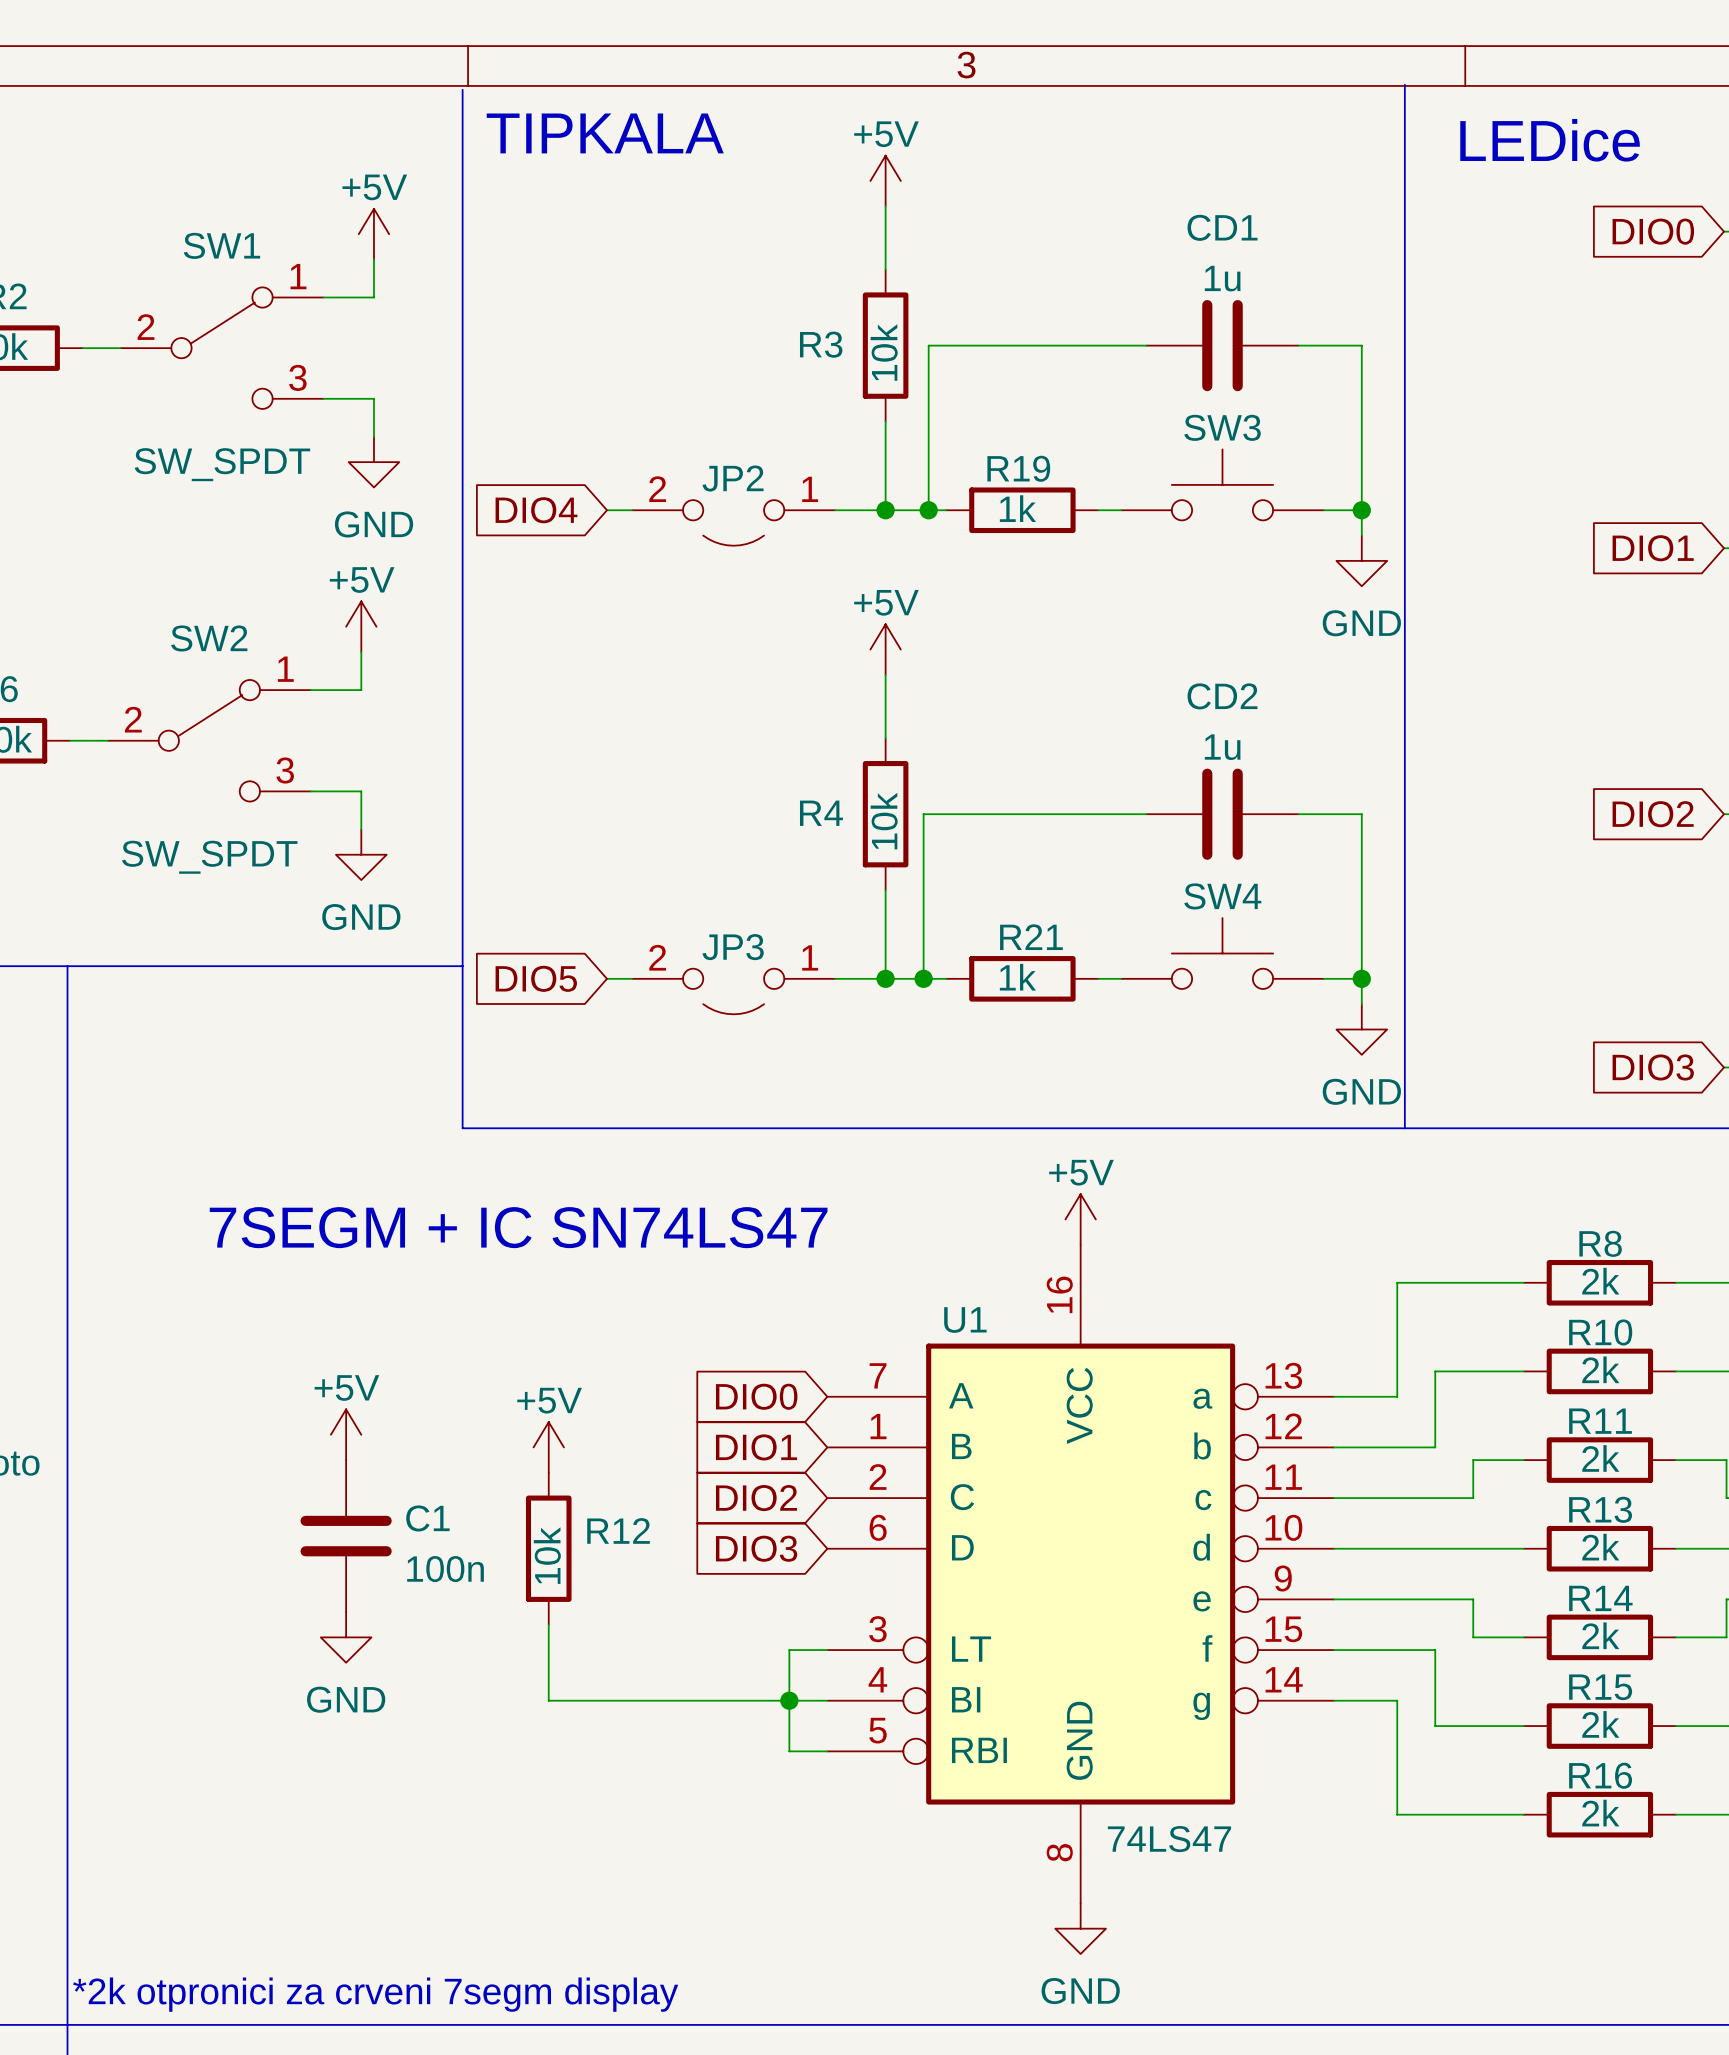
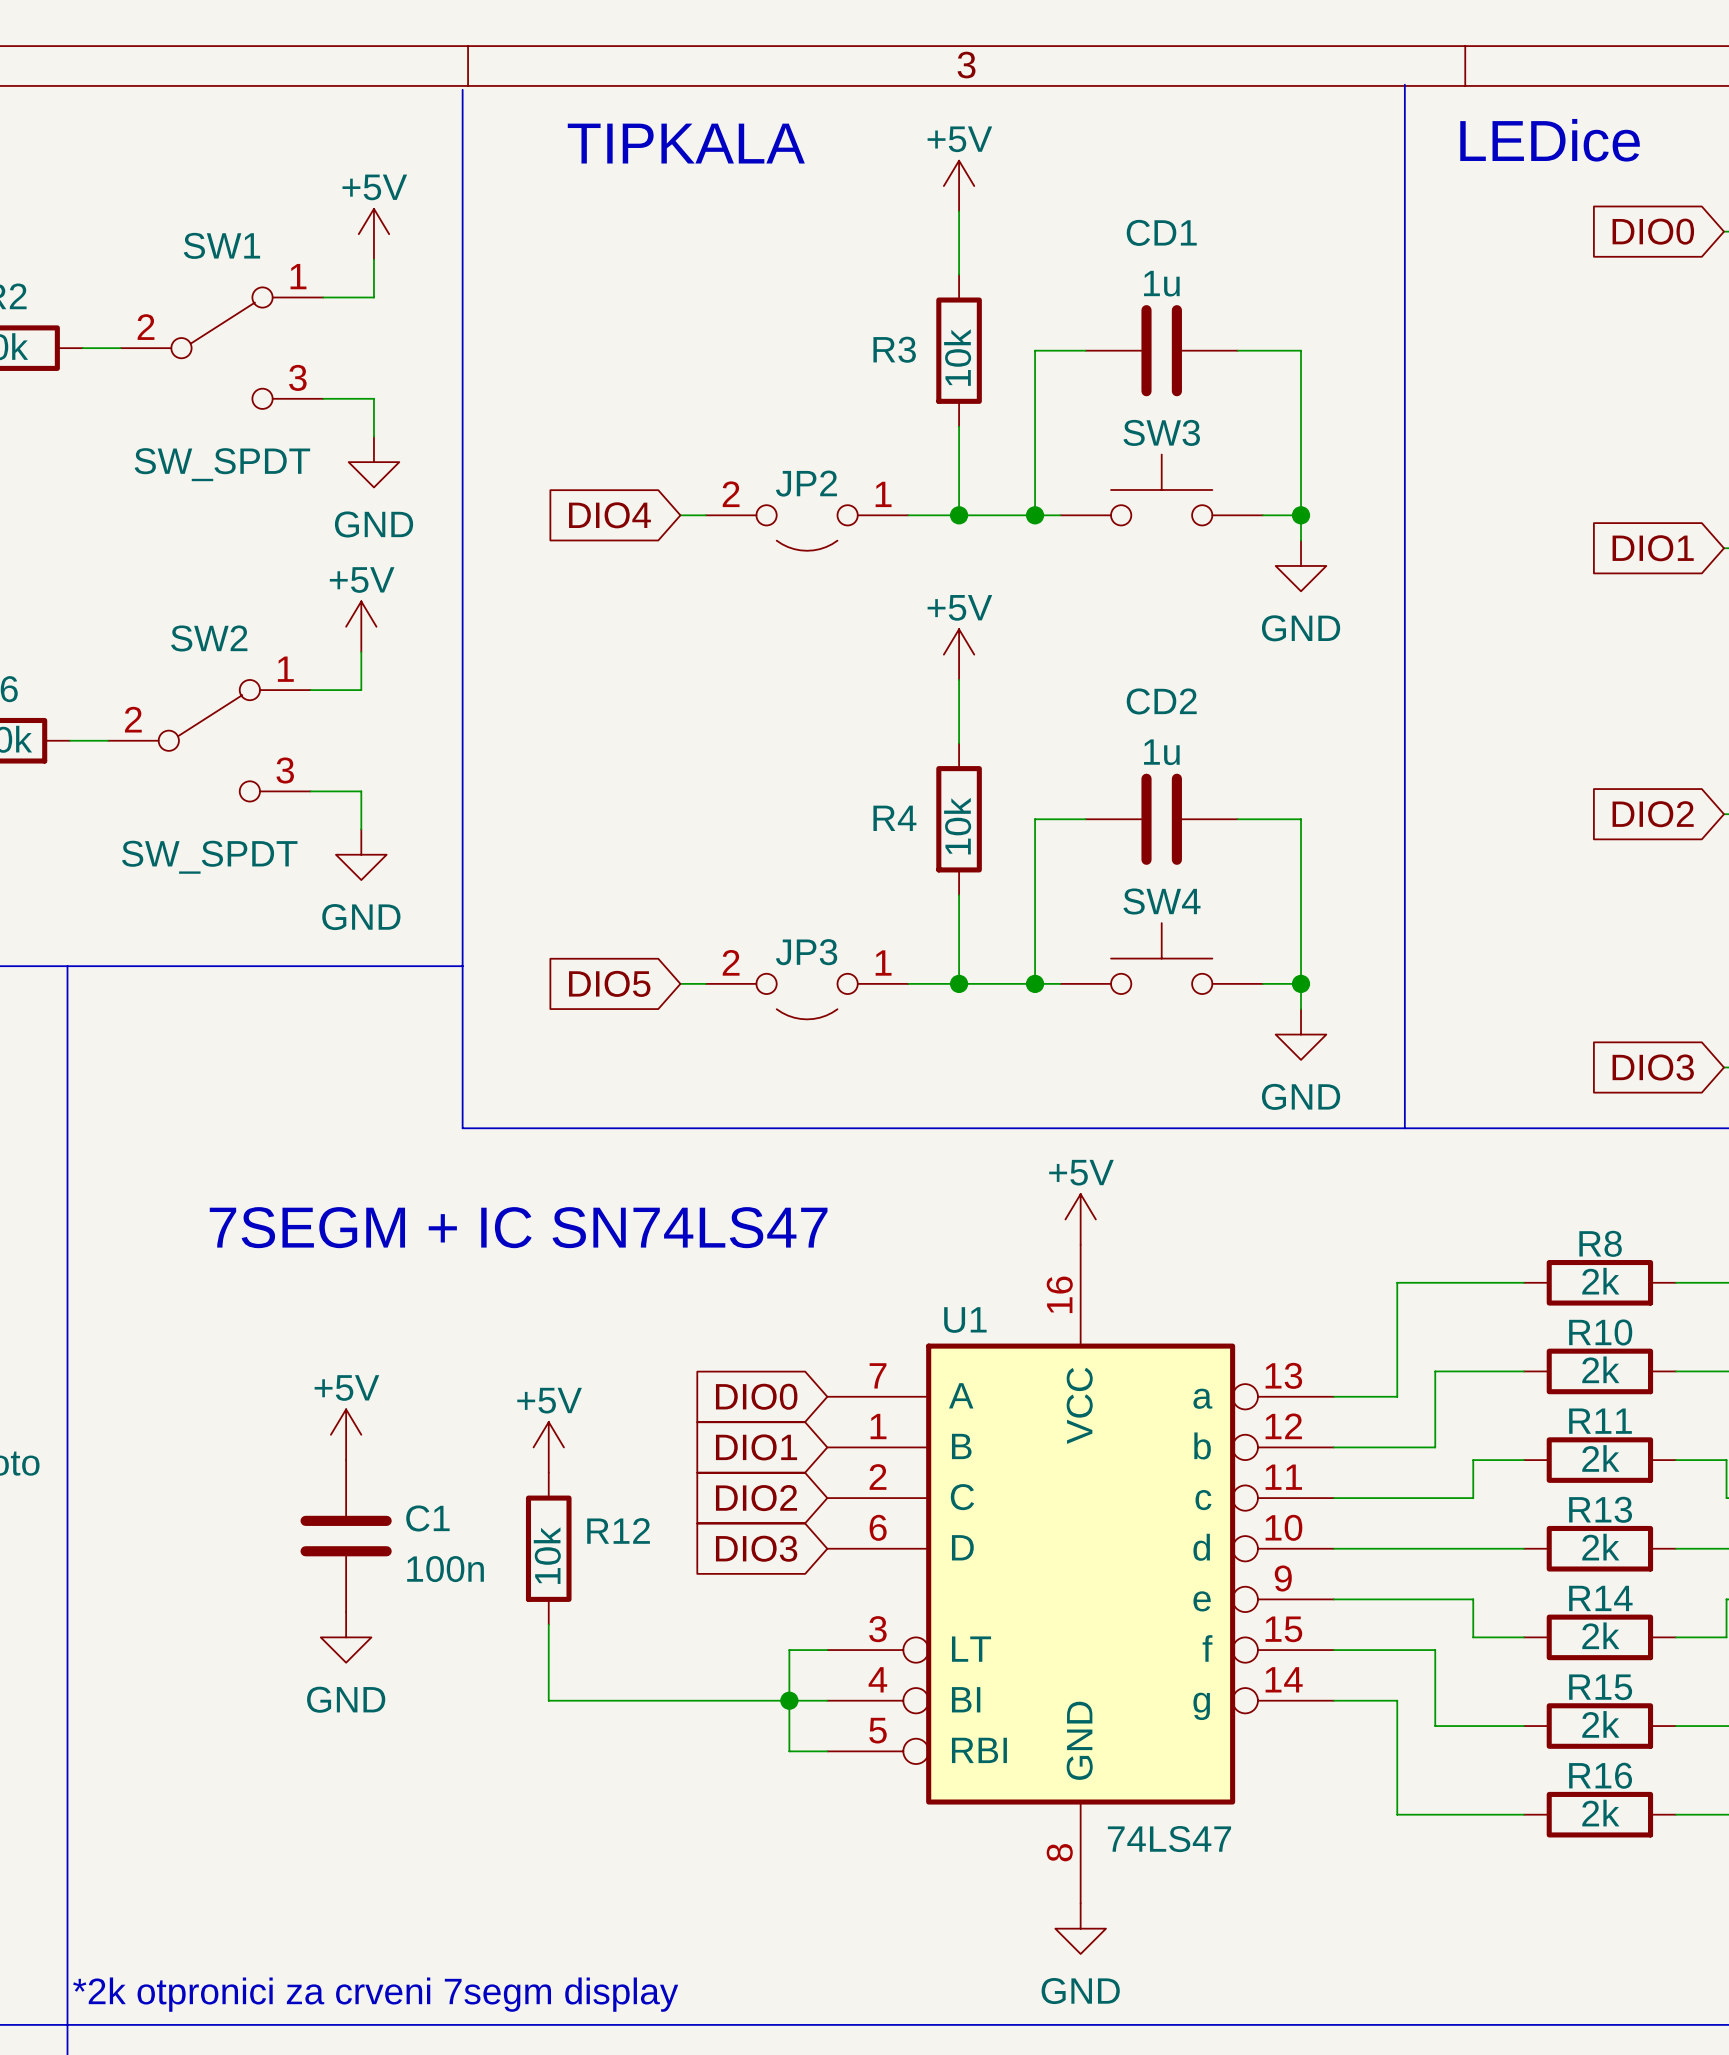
text position: TIPKALA (605, 133) -> TIPKALA (686, 143)
power symbol position: +5V (885, 180) -> +5V (959, 186)
wire: (885, 206) (885, 269) -> (959, 211) (959, 274)
R3 position: (885, 345) -> (959, 350)
wire: (1146, 345) (928, 345) (928, 510) -> none
CD1 position: (1222, 345) -> (1161, 350)
wire: (1298, 345) (1361, 345) (1361, 535) -> (1237, 350) (1301, 350) (1301, 540)
wire: none -> (1085, 350) (1035, 350) (1035, 515)
wire: (885, 421) (885, 510) -> (959, 426) (959, 515)
SW3 position: (1222, 484) -> (1161, 489)
global label position: DIO4 (536, 510) -> DIO4 (609, 515)
wire: (607, 510) (632, 510) -> (680, 515) (705, 515)
wire: (834, 510) (946, 510) -> none
junction: (885, 510) -> none
junction position: (928, 510) -> (959, 515)
R19: 1k (1022, 510) -> none
wire: (1098, 510) (1121, 510) -> none
wire: (1323, 510) (1361, 510) -> (1263, 515) (1301, 515)
junction position: (1361, 510) -> (1301, 515)
wire: none -> (908, 515) (1060, 515)
junction: none -> (1035, 515)
JP2 position: (733, 522) -> (807, 527)
power symbol position: GND (1361, 560) -> GND (1301, 565)
power symbol position: +5V (885, 649) -> +5V (959, 654)
wire: (885, 674) (885, 738) -> (959, 679) (959, 743)
R4 position: (885, 814) -> (959, 819)
wire: (1146, 814) (923, 814) (923, 978) -> none
CD2 position: (1222, 814) -> (1161, 819)
wire: (1298, 814) (1361, 814) (1361, 1004) -> (1237, 819) (1301, 819) (1301, 1009)
wire: none -> (1085, 819) (1035, 819) (1035, 983)
wire: (885, 890) (885, 978) -> (959, 895) (959, 983)
SW4 position: (1222, 953) -> (1161, 958)
global label position: DIO5 (536, 978) -> DIO5 (609, 983)
wire: (607, 978) (632, 978) -> (680, 983) (705, 983)
wire: (834, 978) (946, 978) -> none
junction: (885, 978) -> none
junction position: (923, 978) -> (959, 983)
R21: 1k (1022, 978) -> none
wire: (1098, 978) (1121, 978) -> none
wire: (1323, 978) (1361, 978) -> (1263, 983) (1301, 983)
junction position: (1361, 978) -> (1301, 983)
wire: none -> (908, 983) (1060, 983)
junction: none -> (1035, 983)
JP3 position: (733, 991) -> (807, 996)
power symbol position: GND (1361, 1029) -> GND (1301, 1034)

